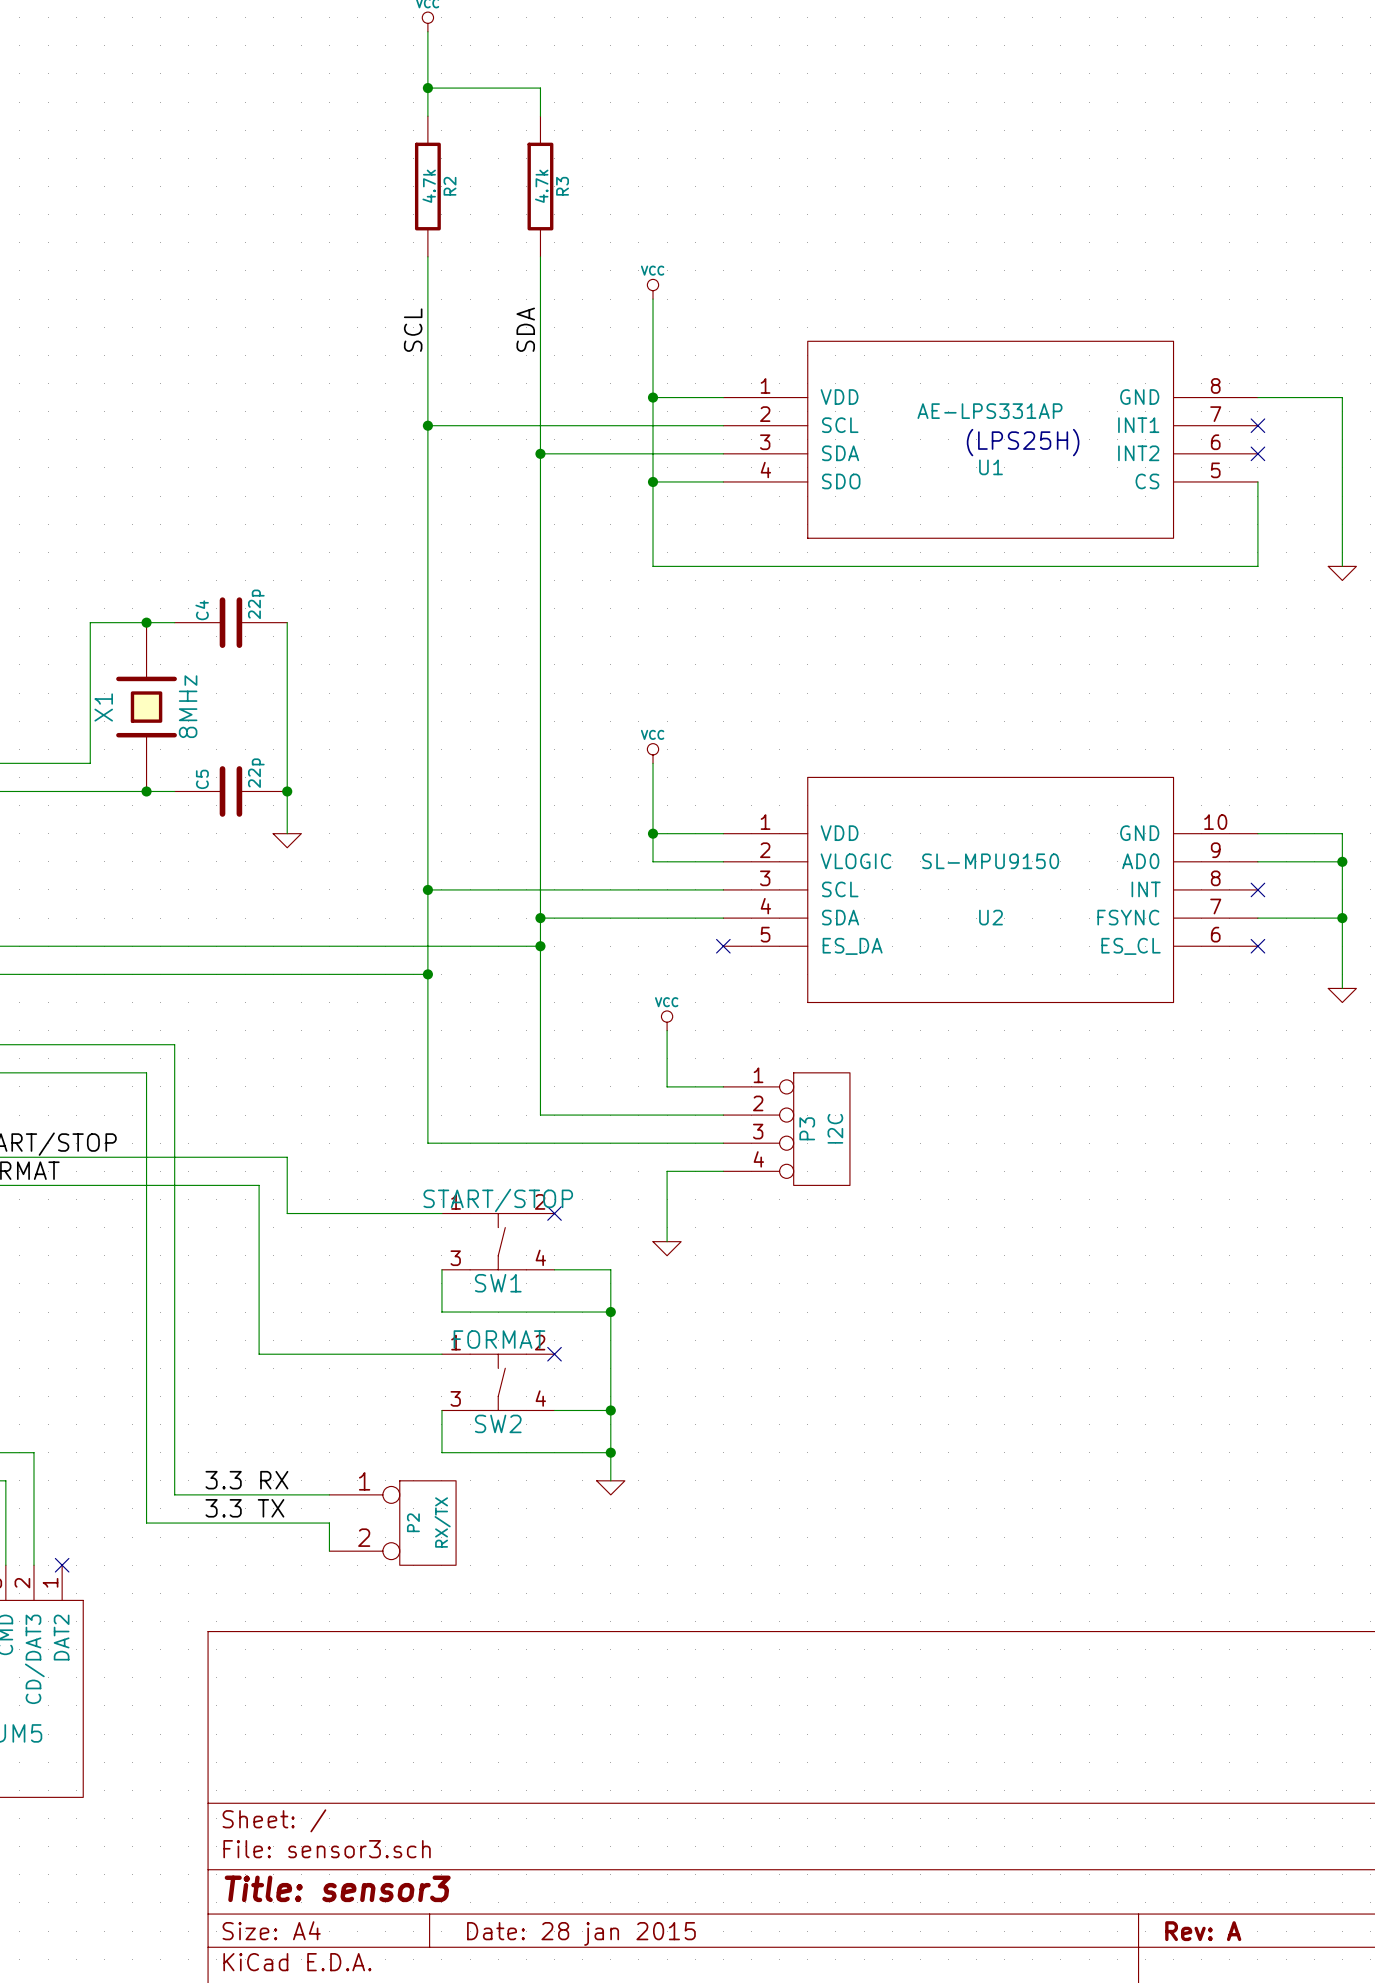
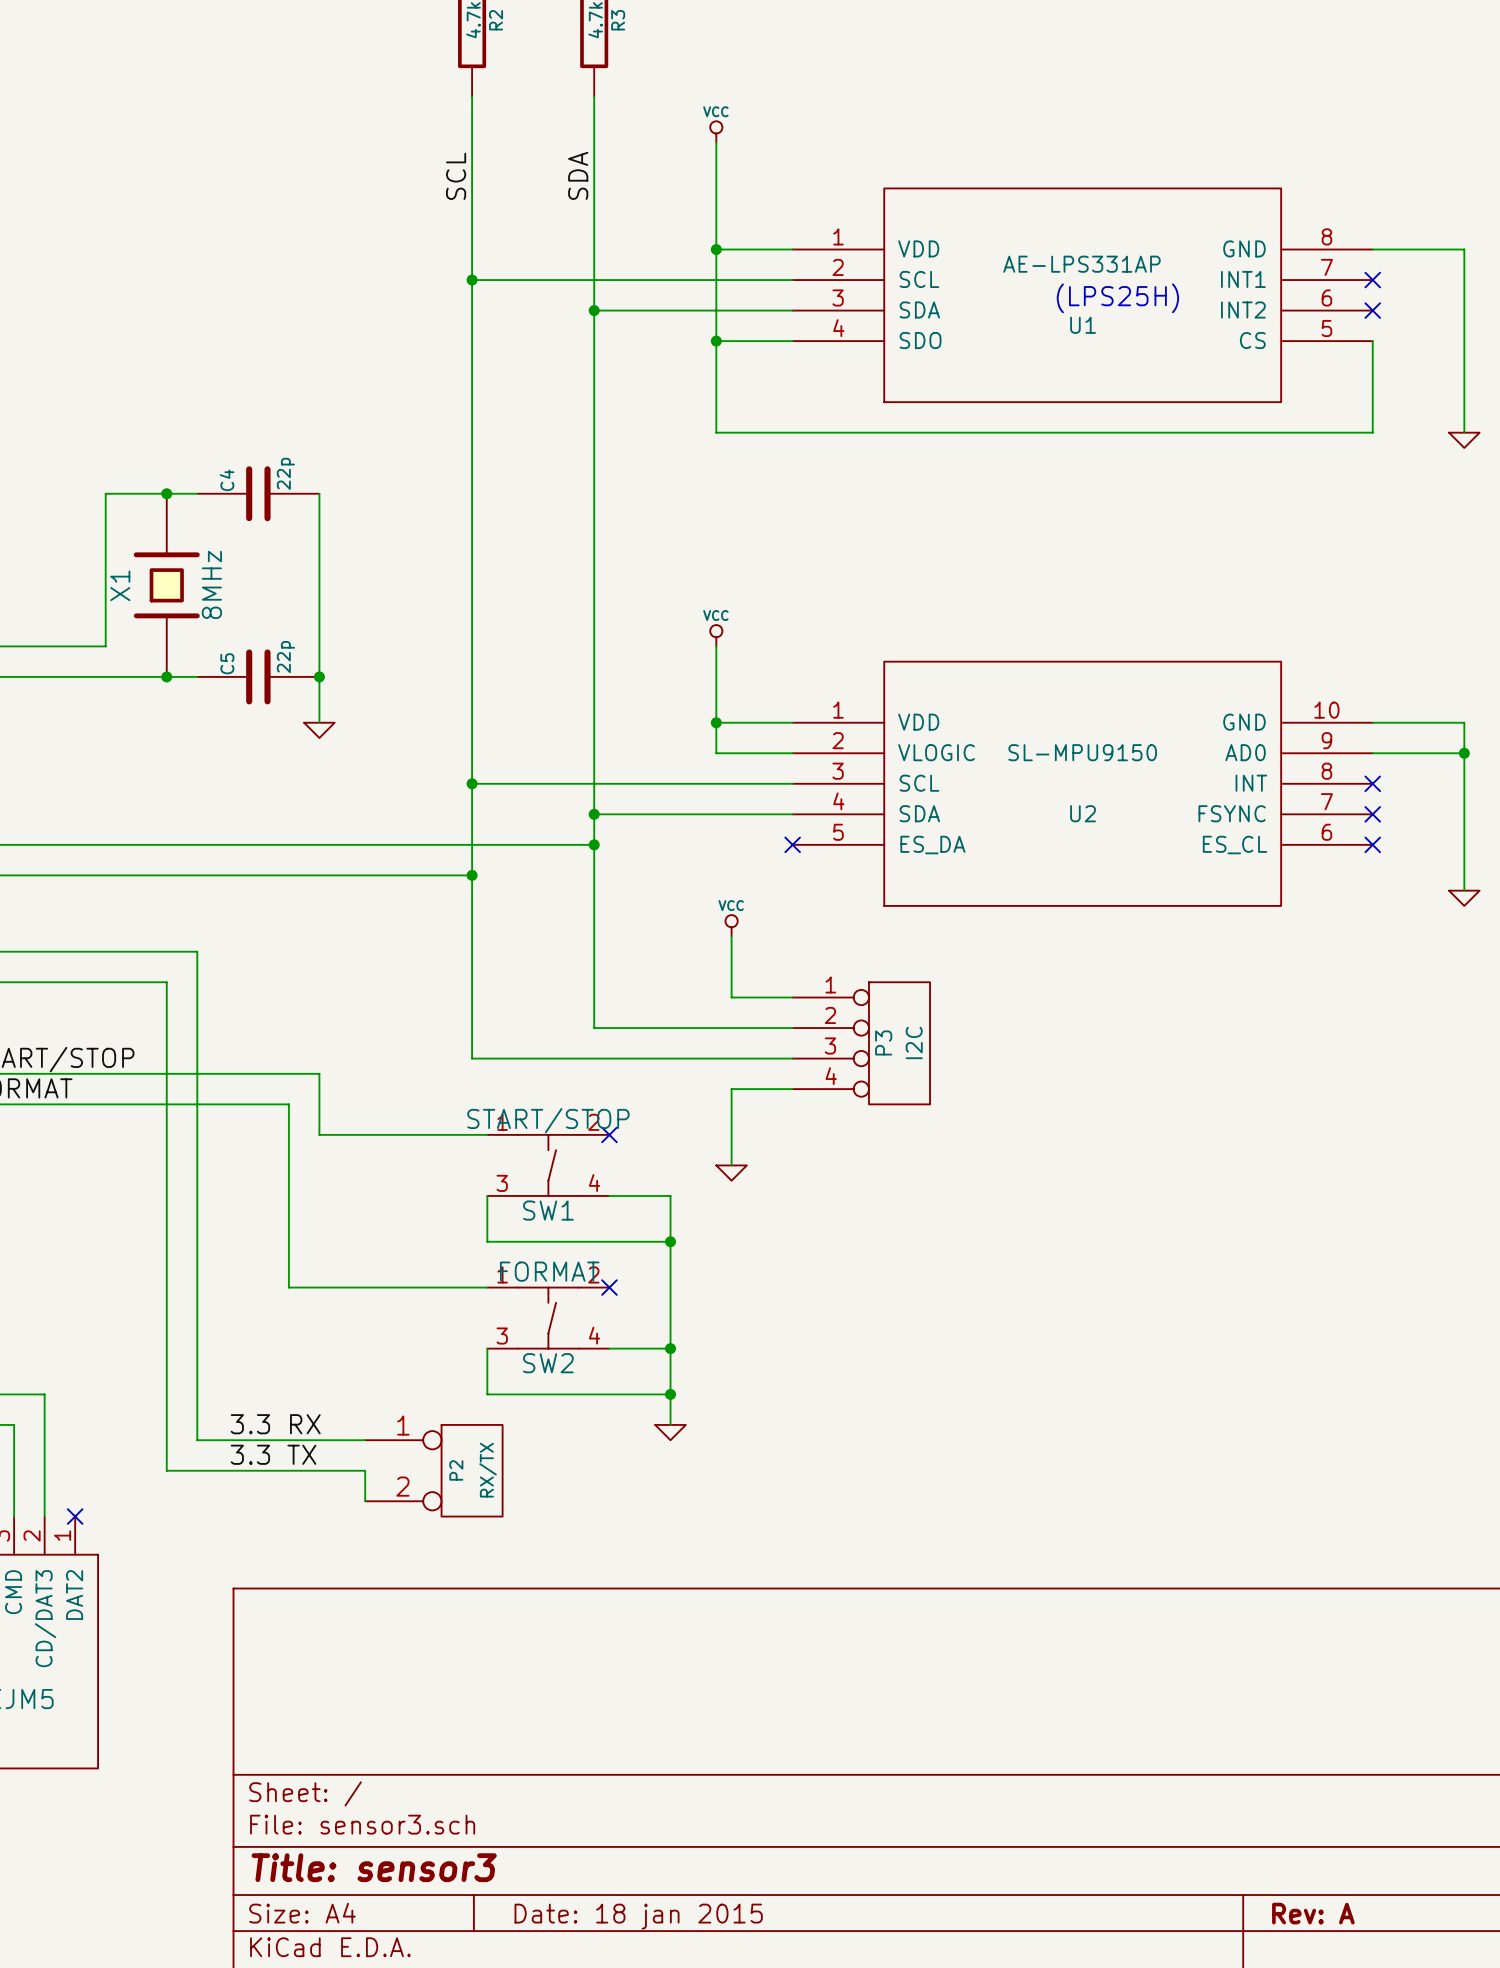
wire: (1257, 918) (1342, 918) -> none
no-connect mark: none -> (1372, 814)
junction: (1342, 918) -> none
title block: Date: 28 jan 2015 (581, 1933) -> Date: 18 jan 2015 (638, 1916)

